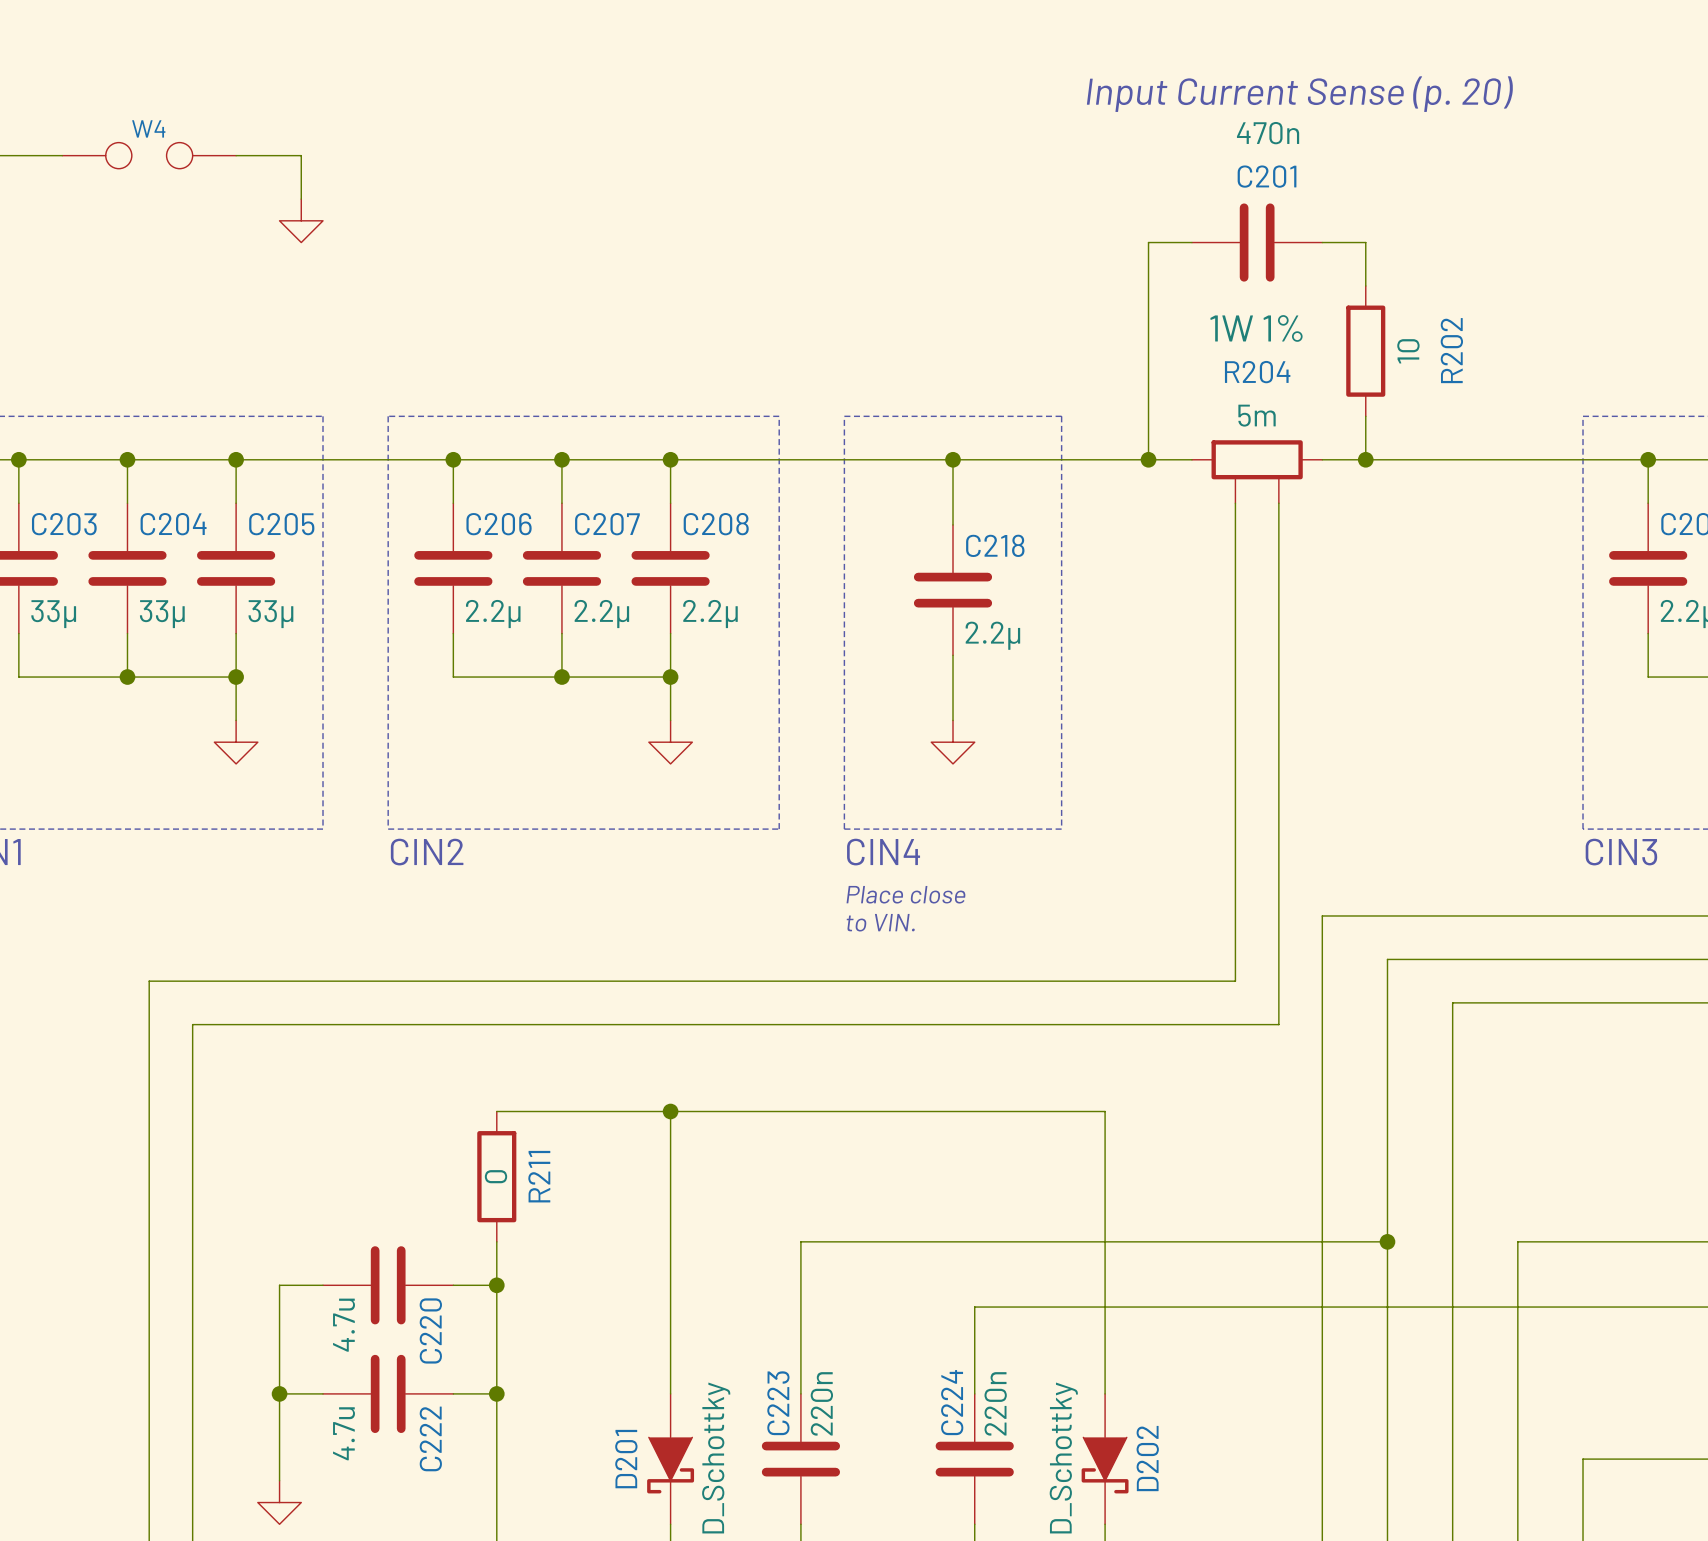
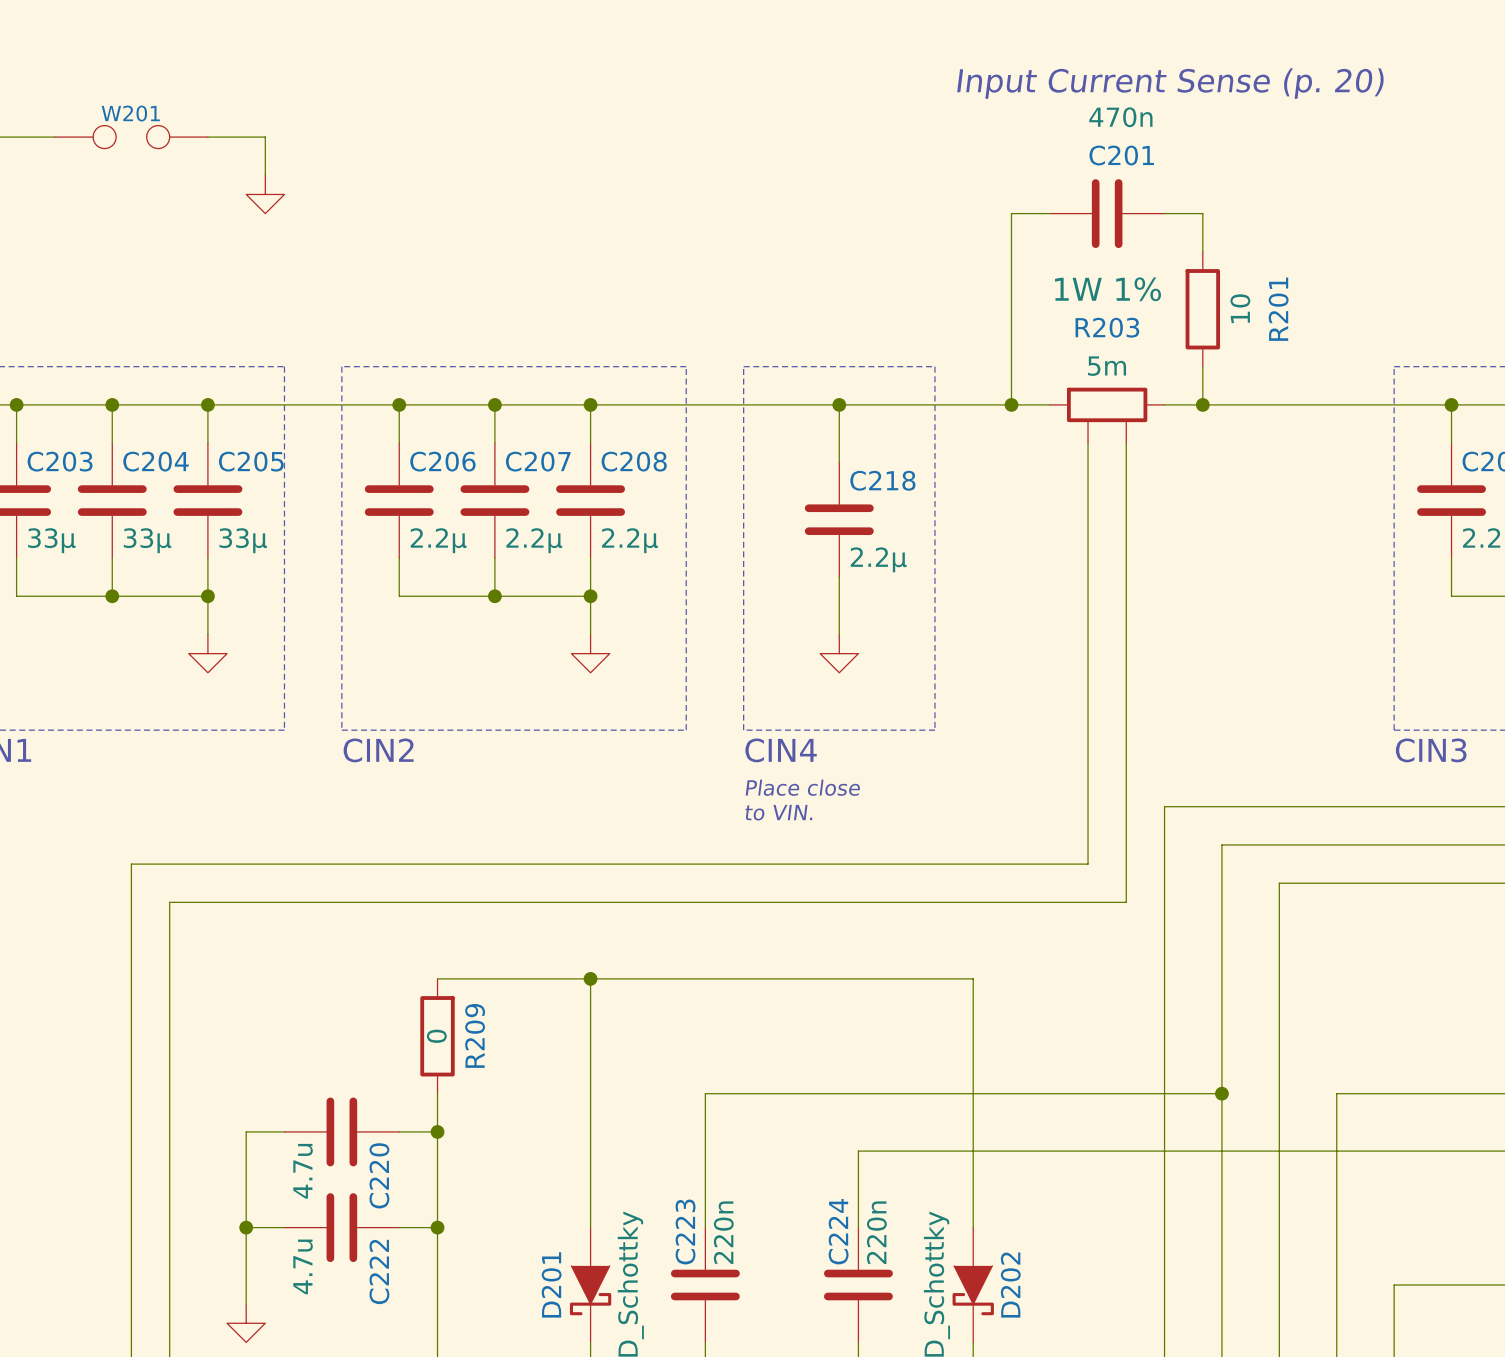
W4 name: W4 (148, 128) -> W201 (130, 113)
R202 name: R202 (1451, 350) -> R201 (1278, 309)
R204 name: R204 (1257, 372) -> R203 (1107, 327)
R211 name: R211 (539, 1176) -> R209 (475, 1035)

